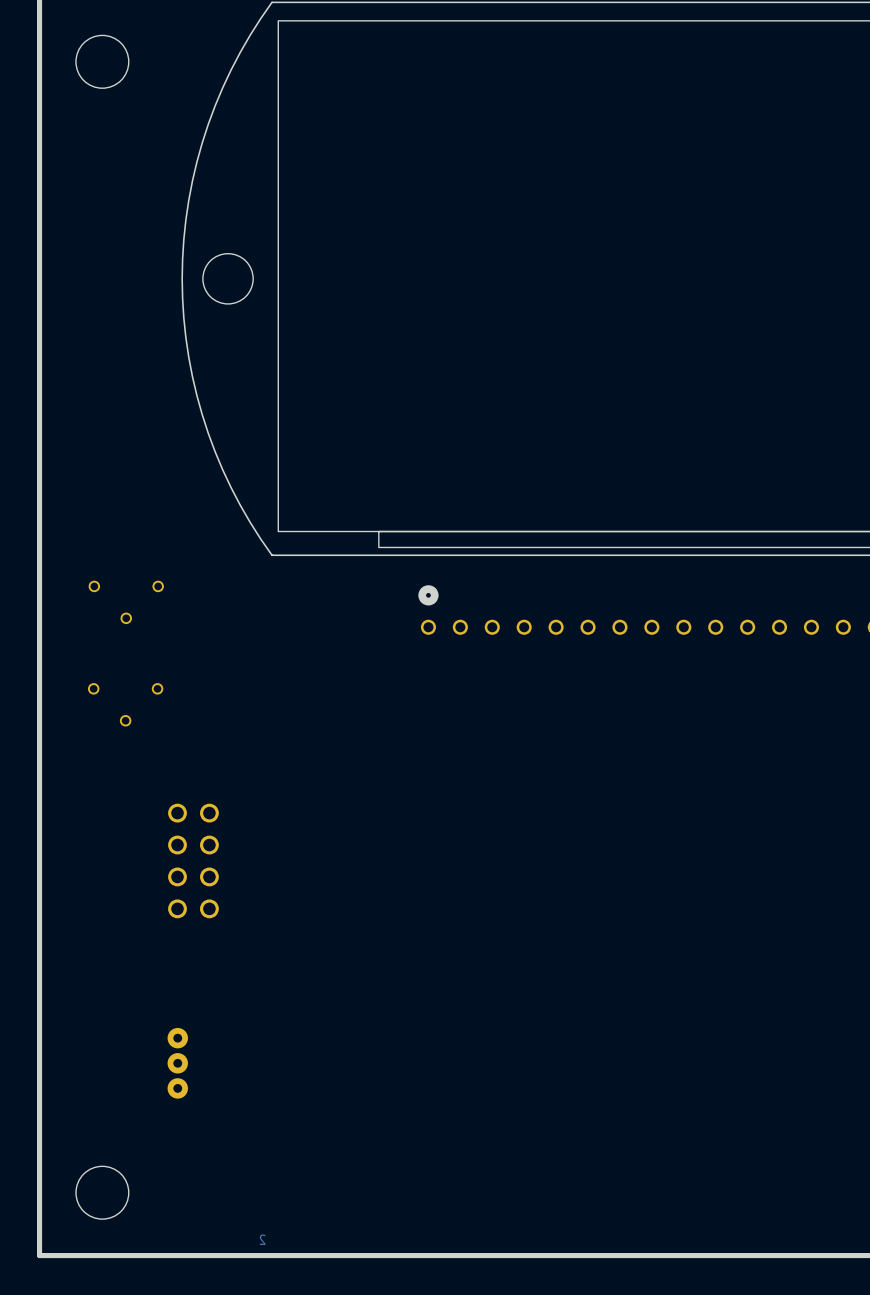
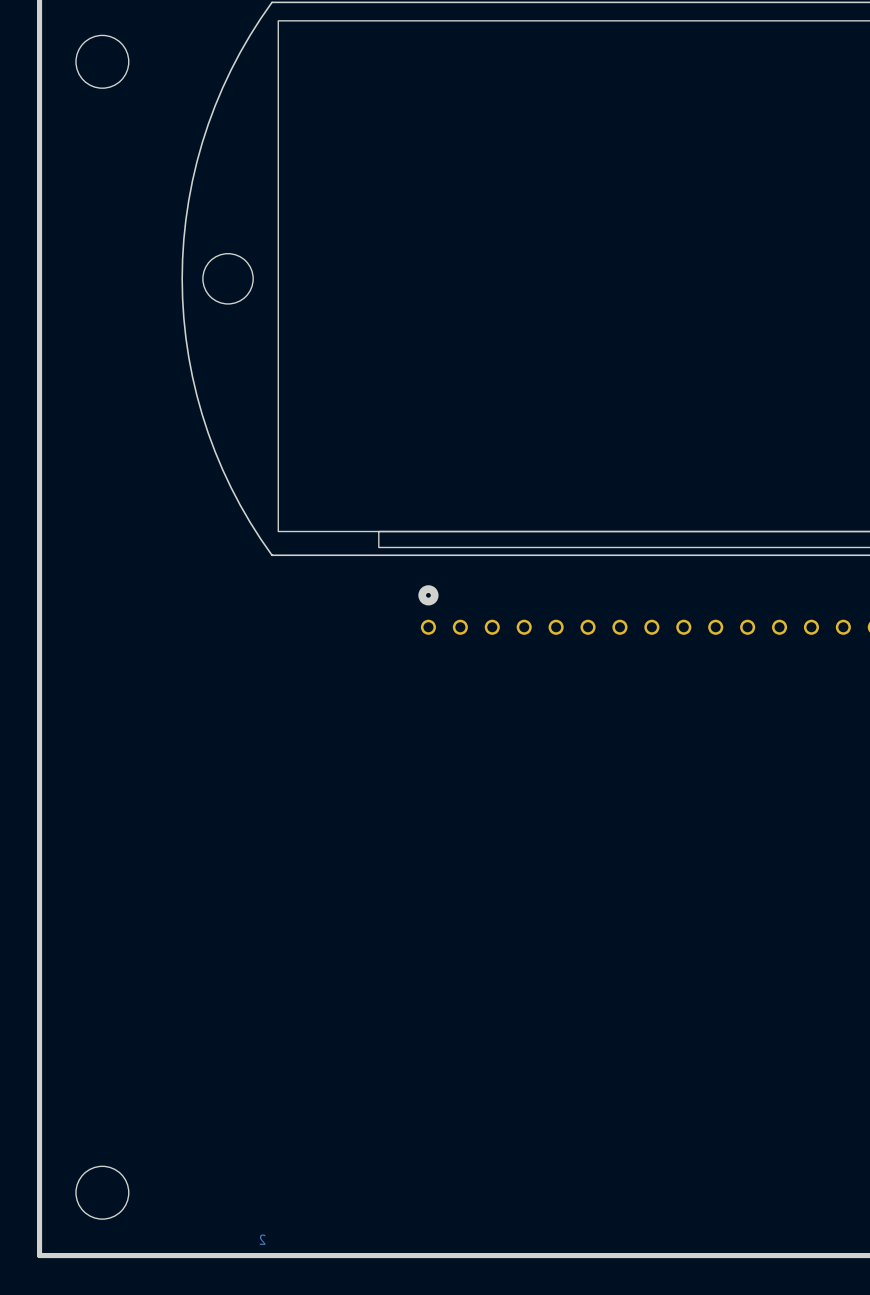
part: (126, 602) -> none
part: (125, 704) -> none
part: (193, 860) -> none
part: (177, 1063) -> none

